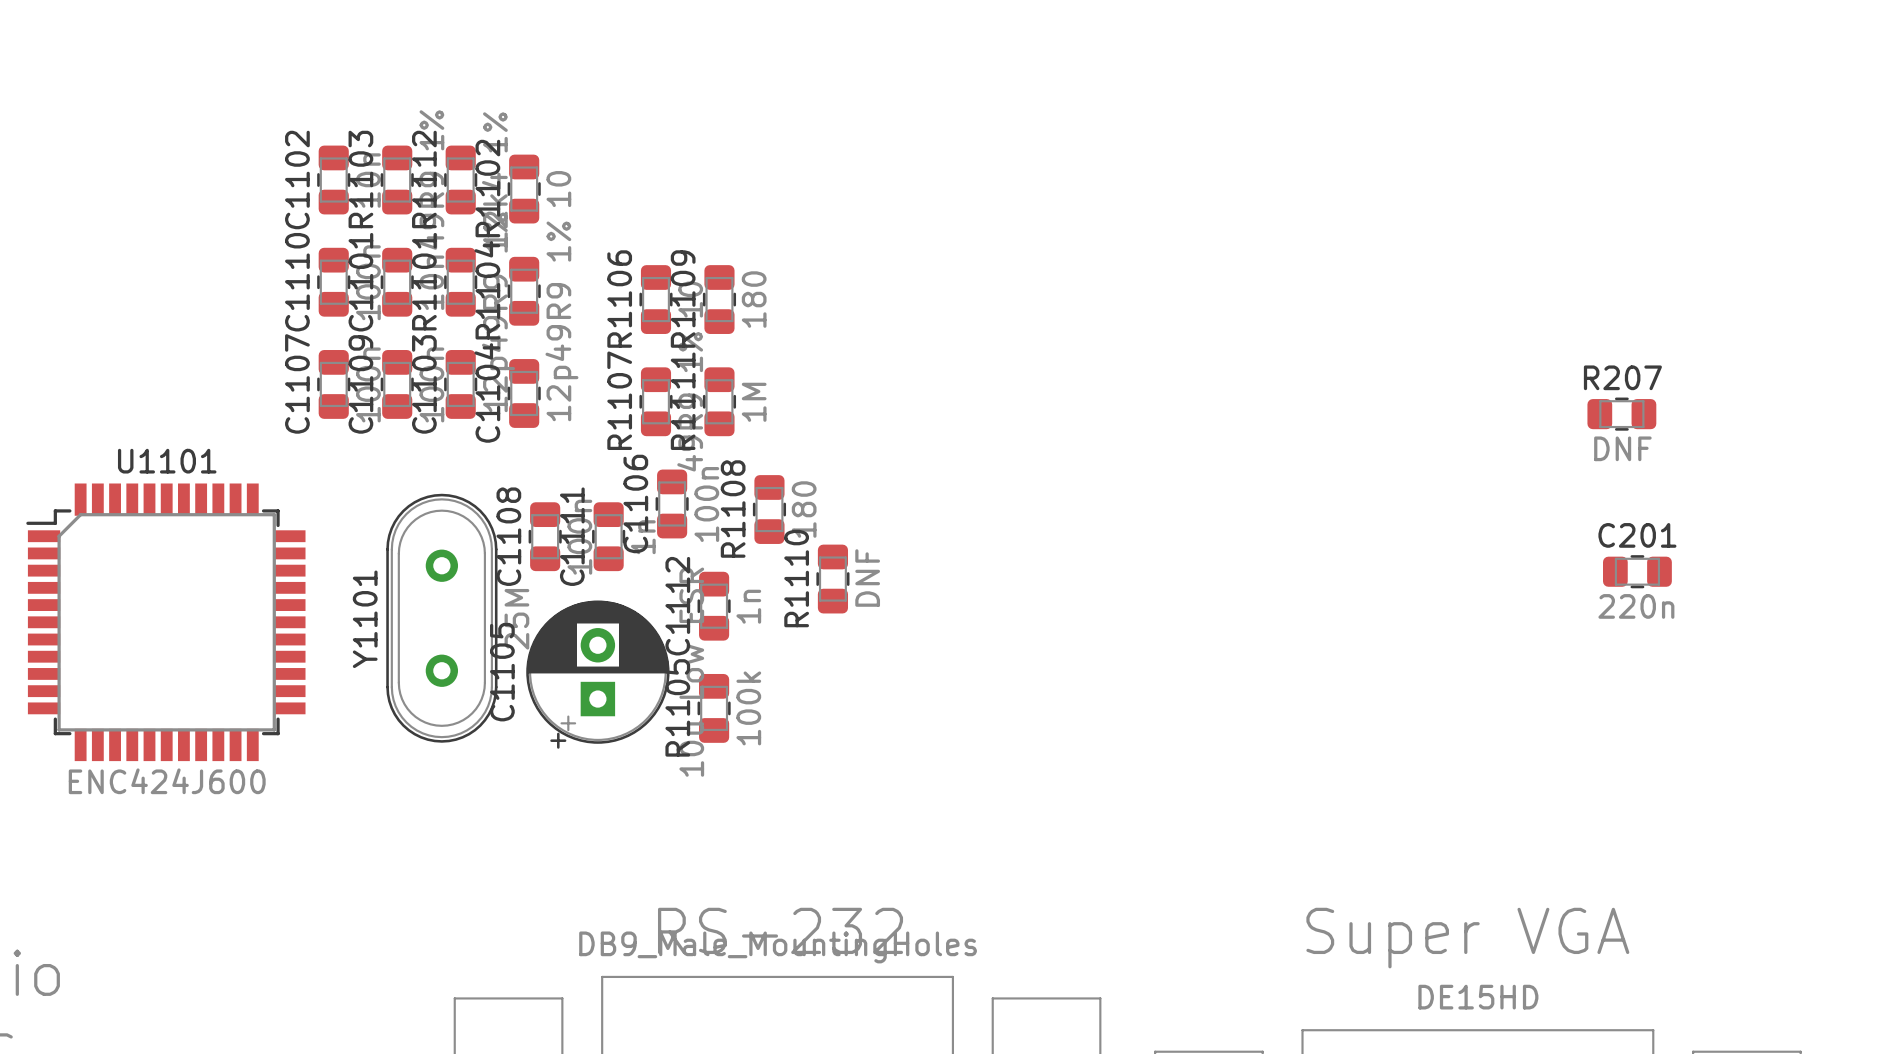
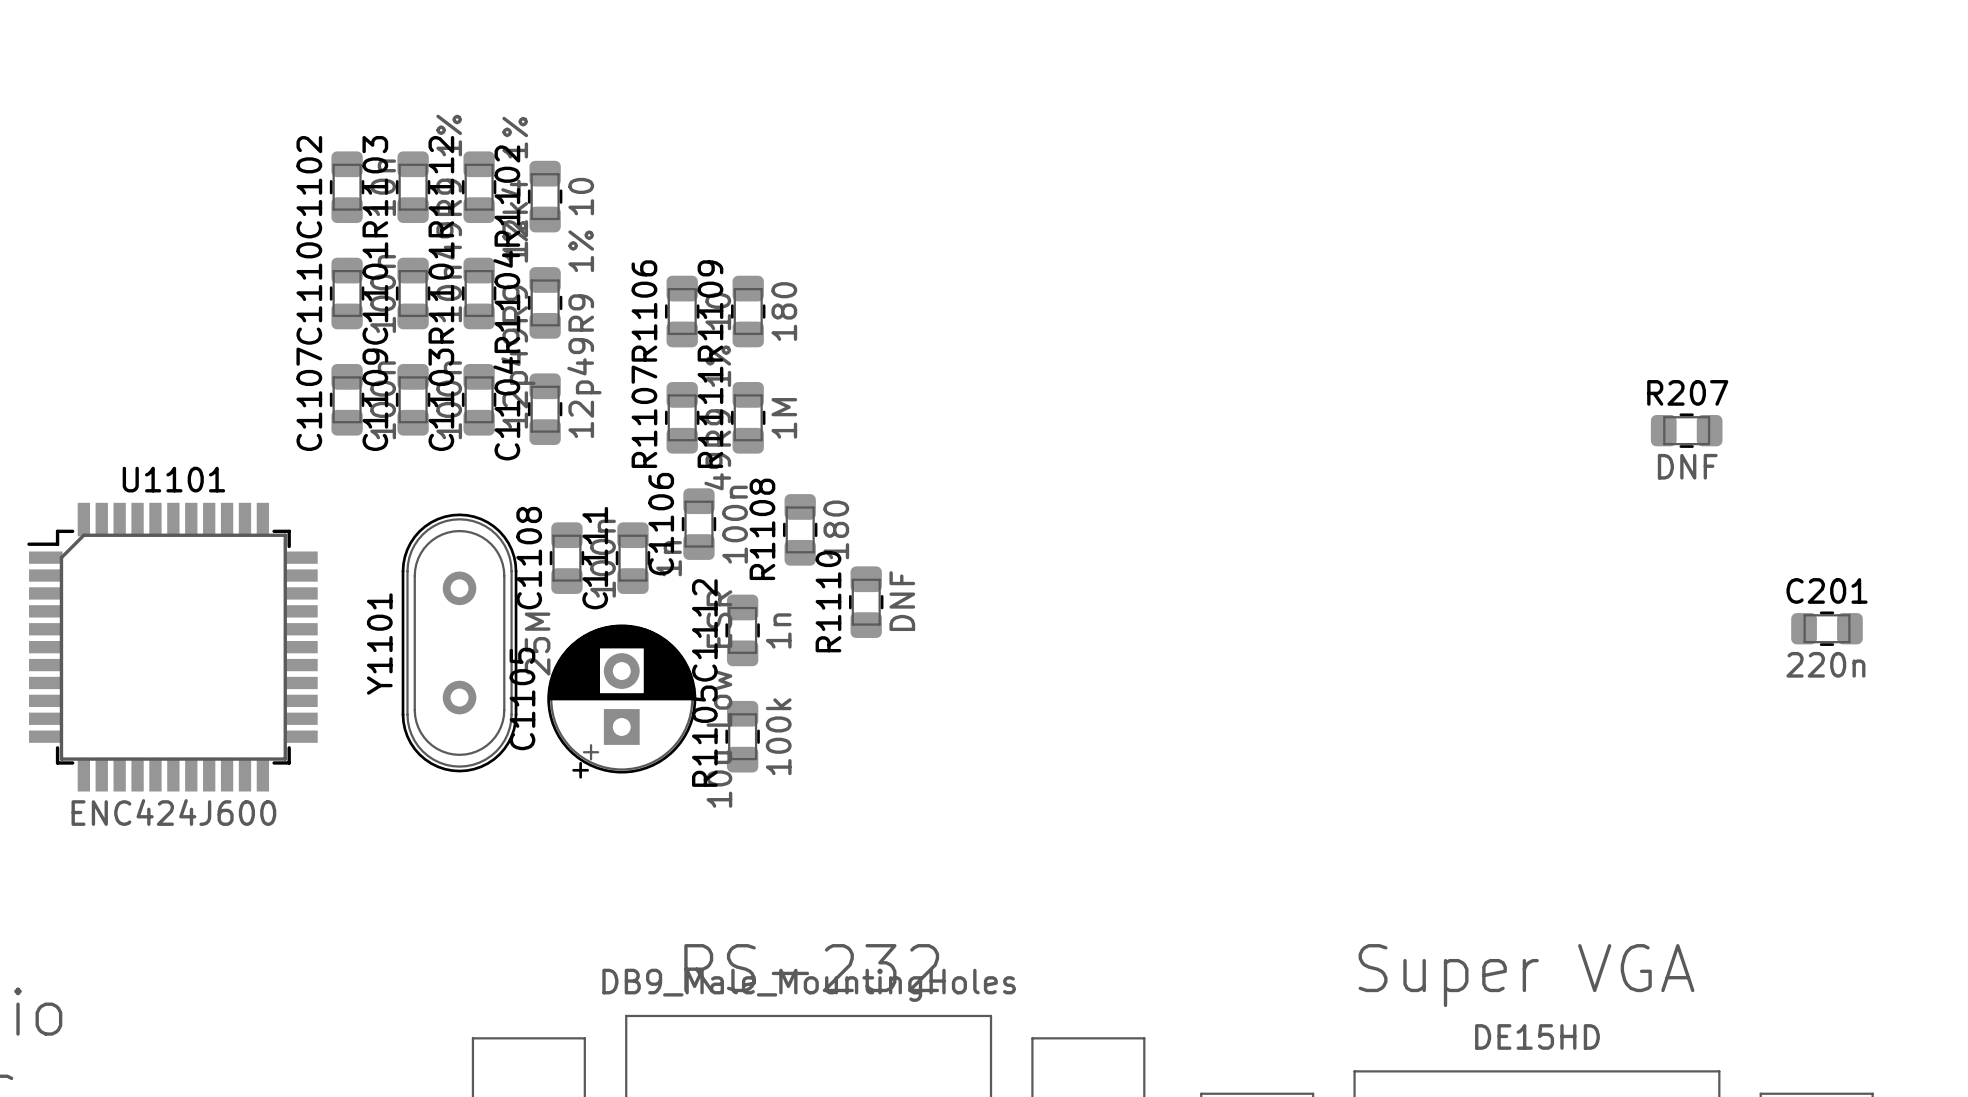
C201 position: (1637, 571) -> (1827, 628)

